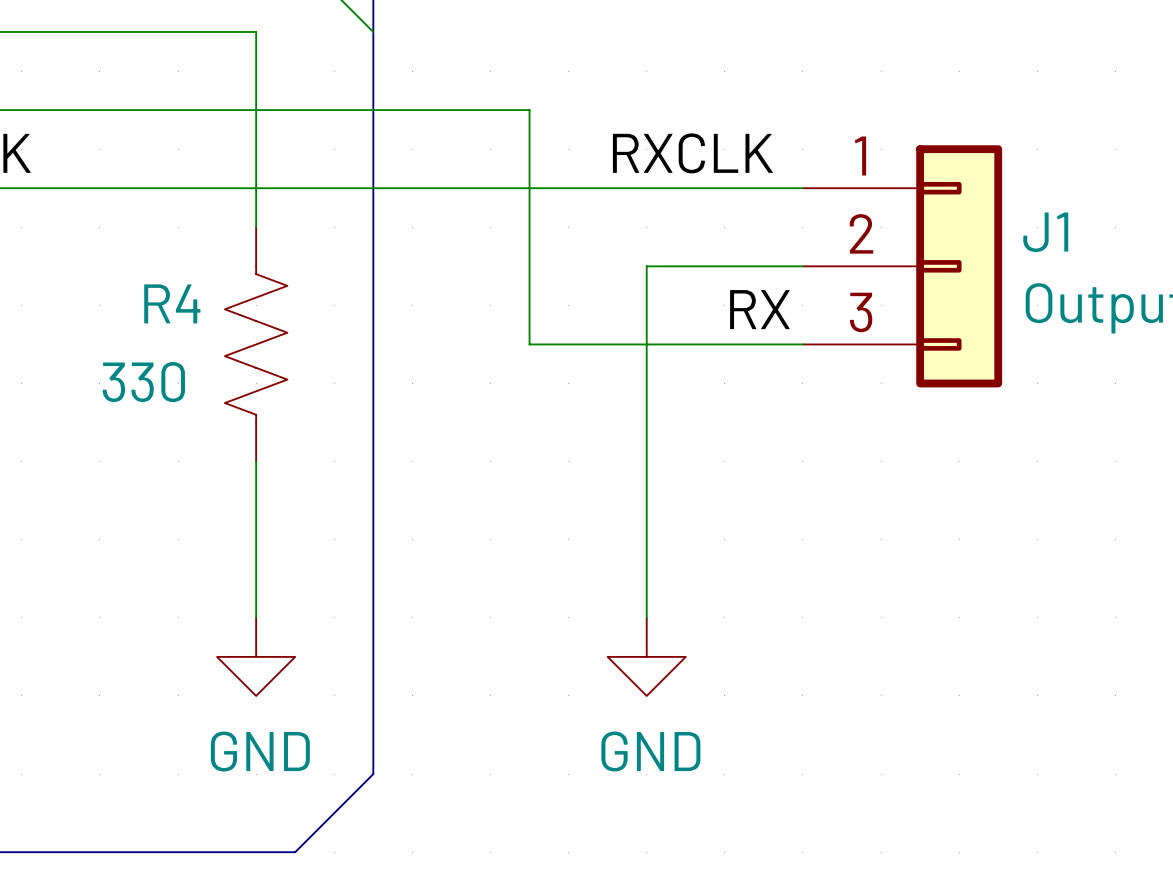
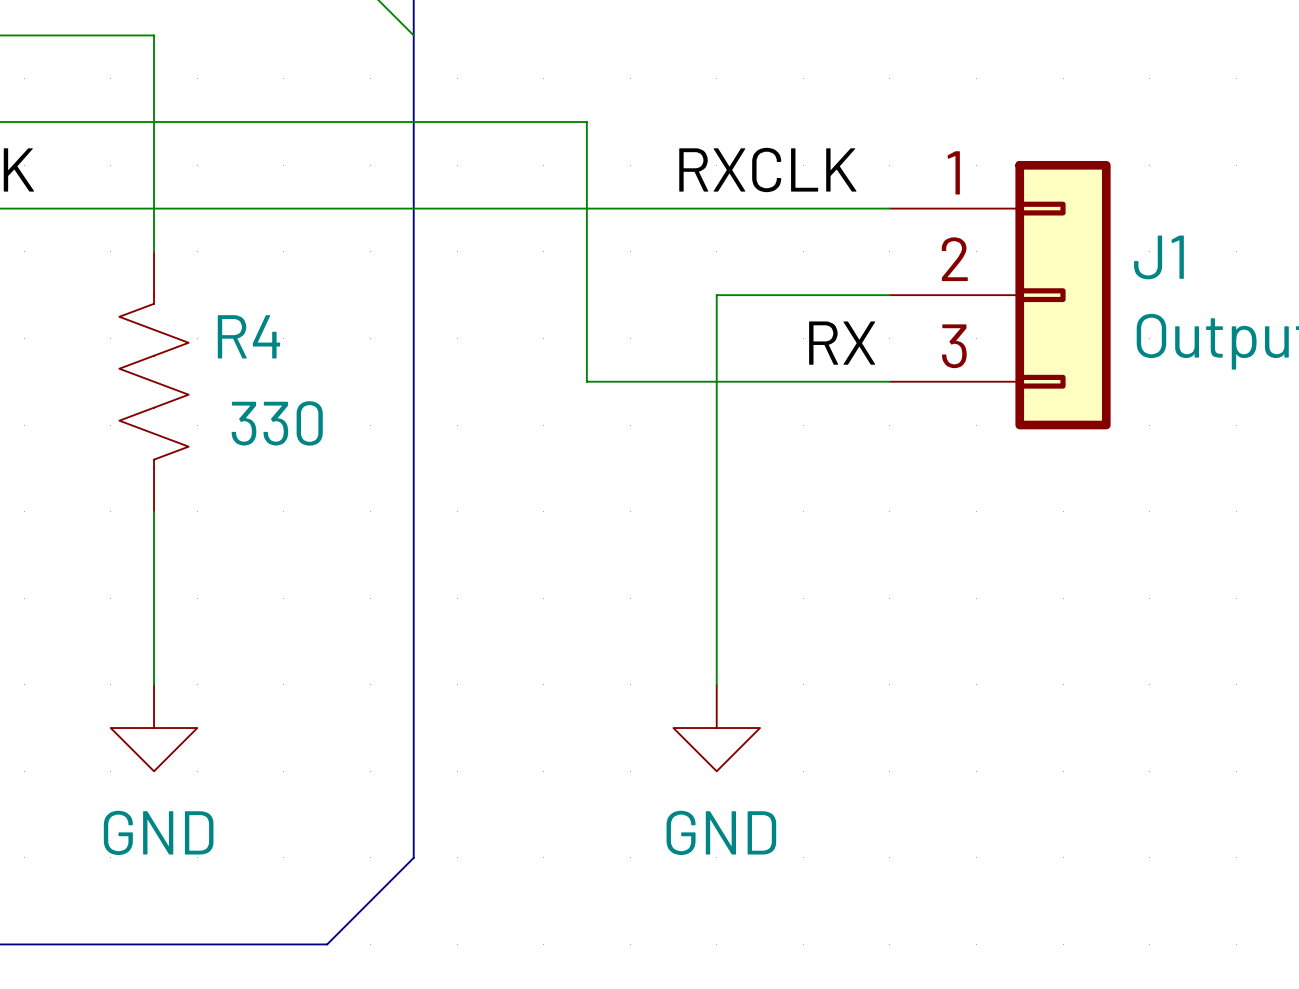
wire: (138, 31) (256, 31) (256, 227) -> (154, 35) (154, 251)
R4 flip: as is (256, 344) -> left-right (154, 381)
wire: (256, 461) (256, 617) -> (154, 511) (154, 684)
power symbol position: GND (256, 656) -> GND (154, 728)

